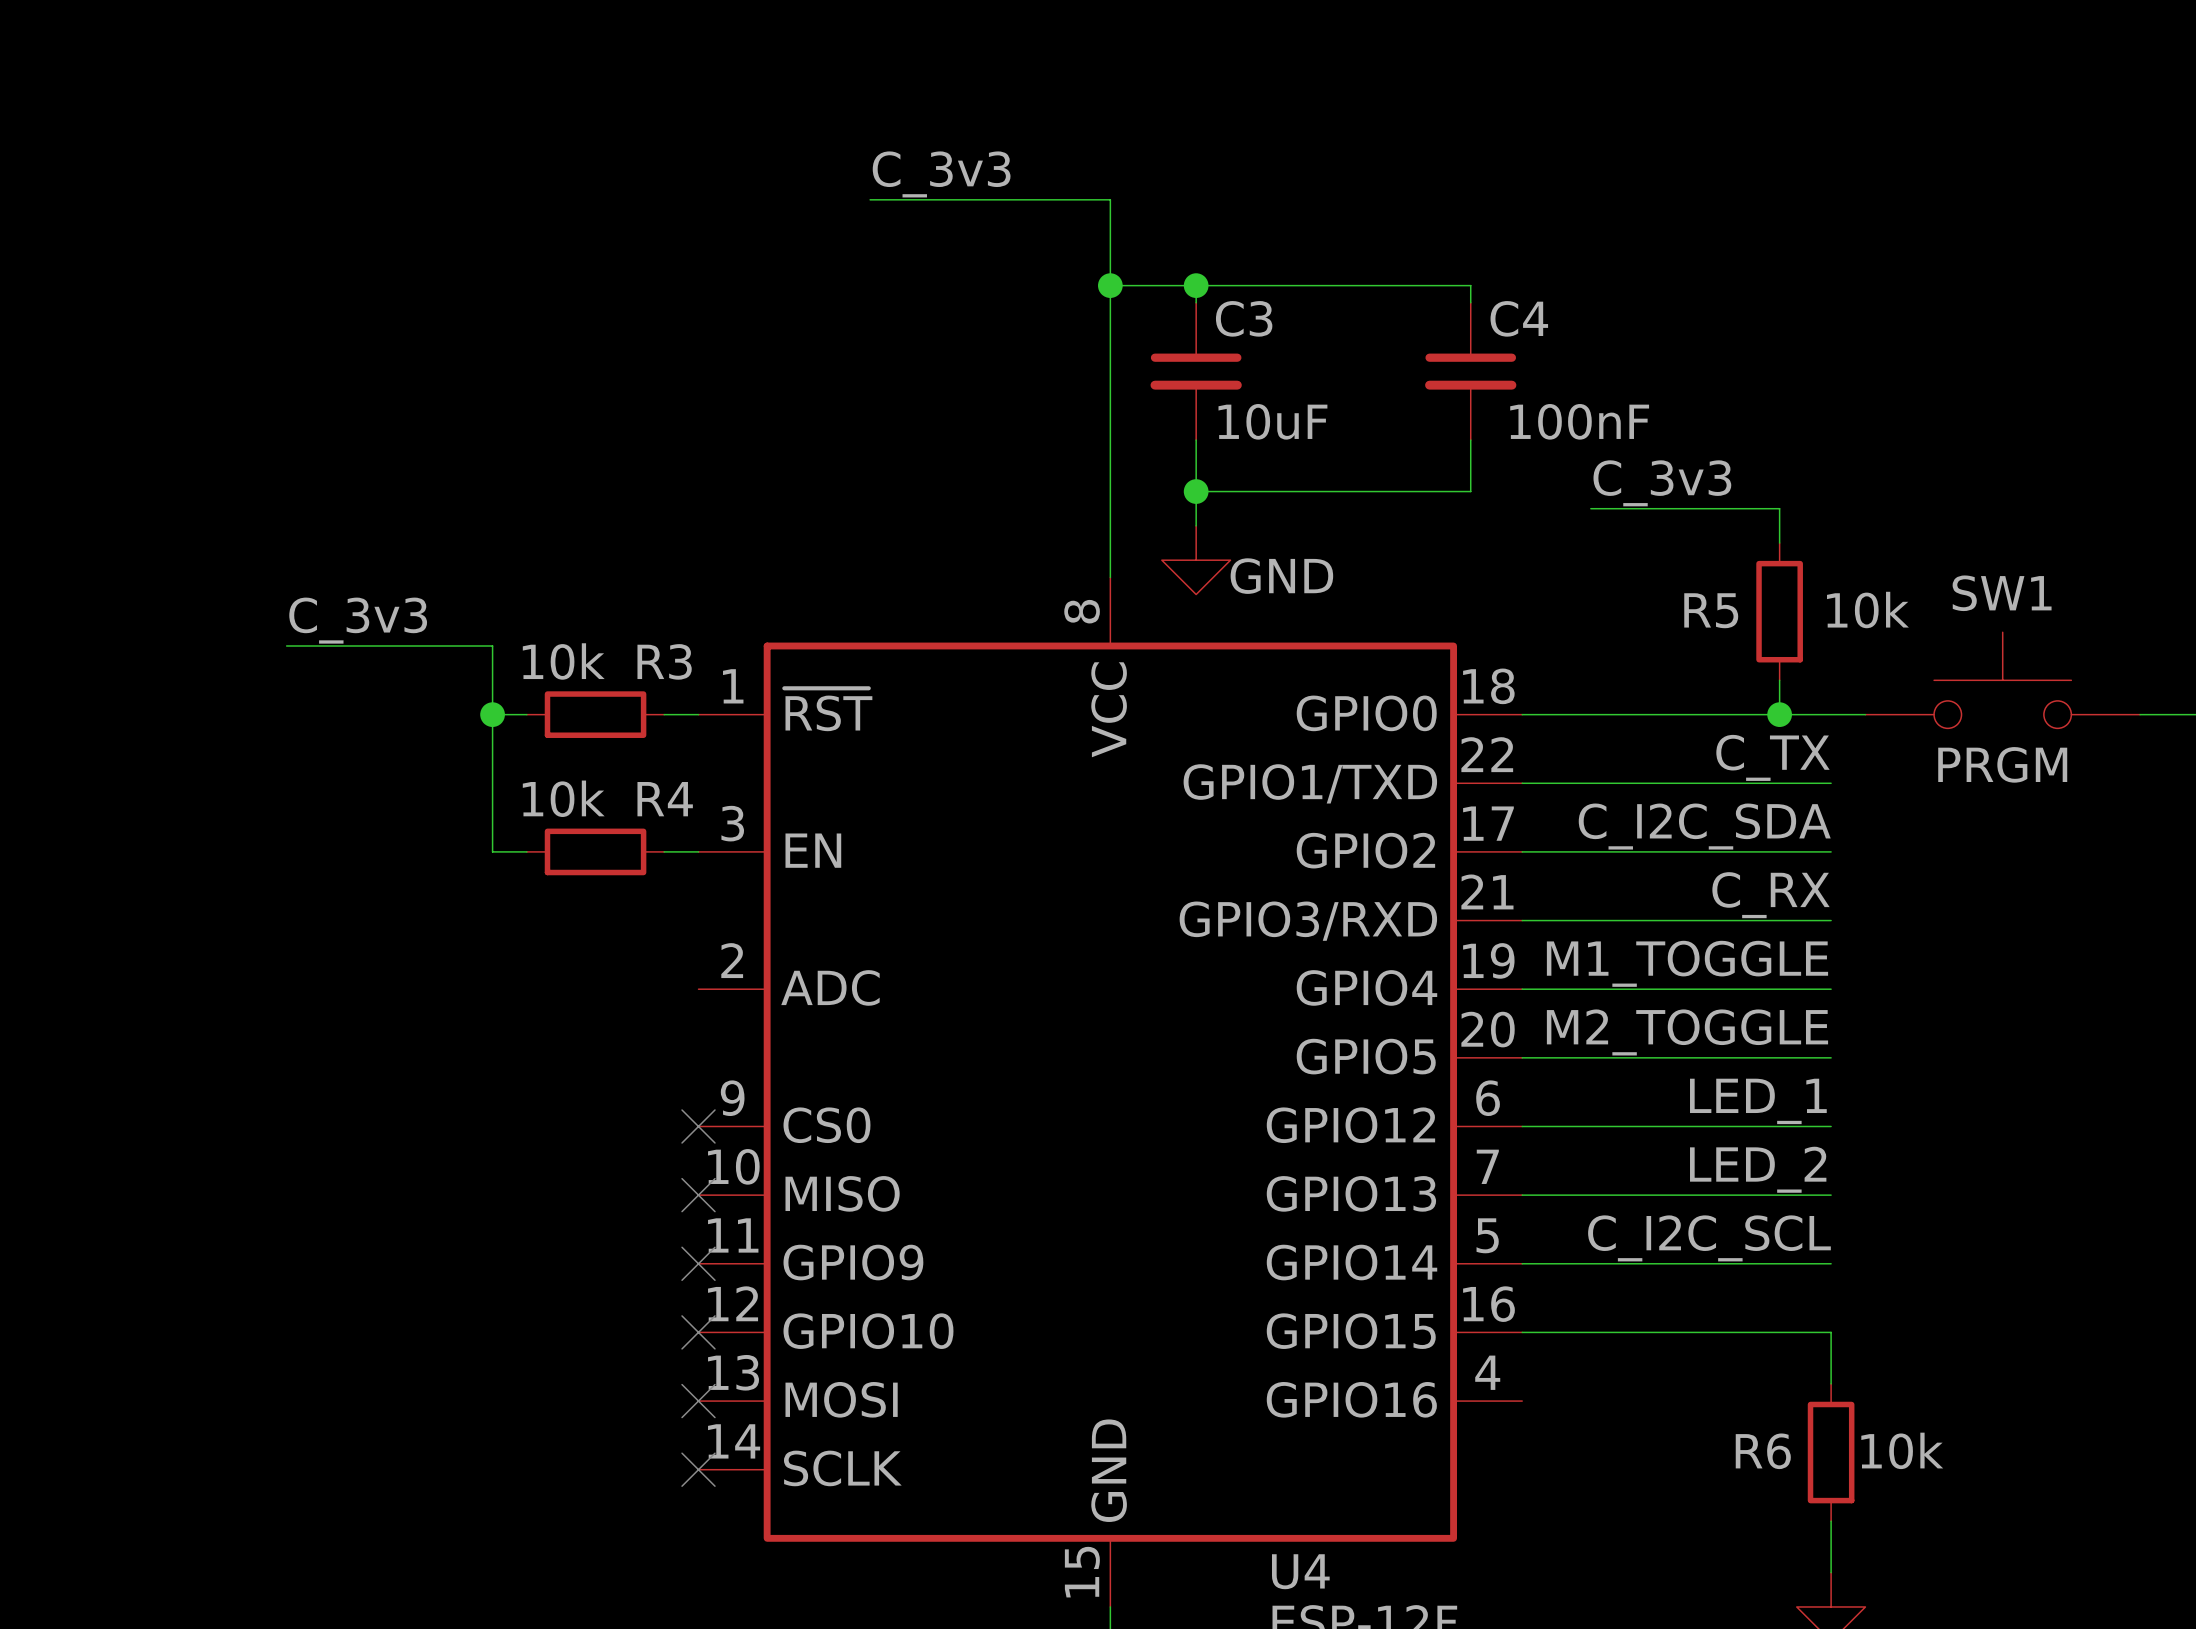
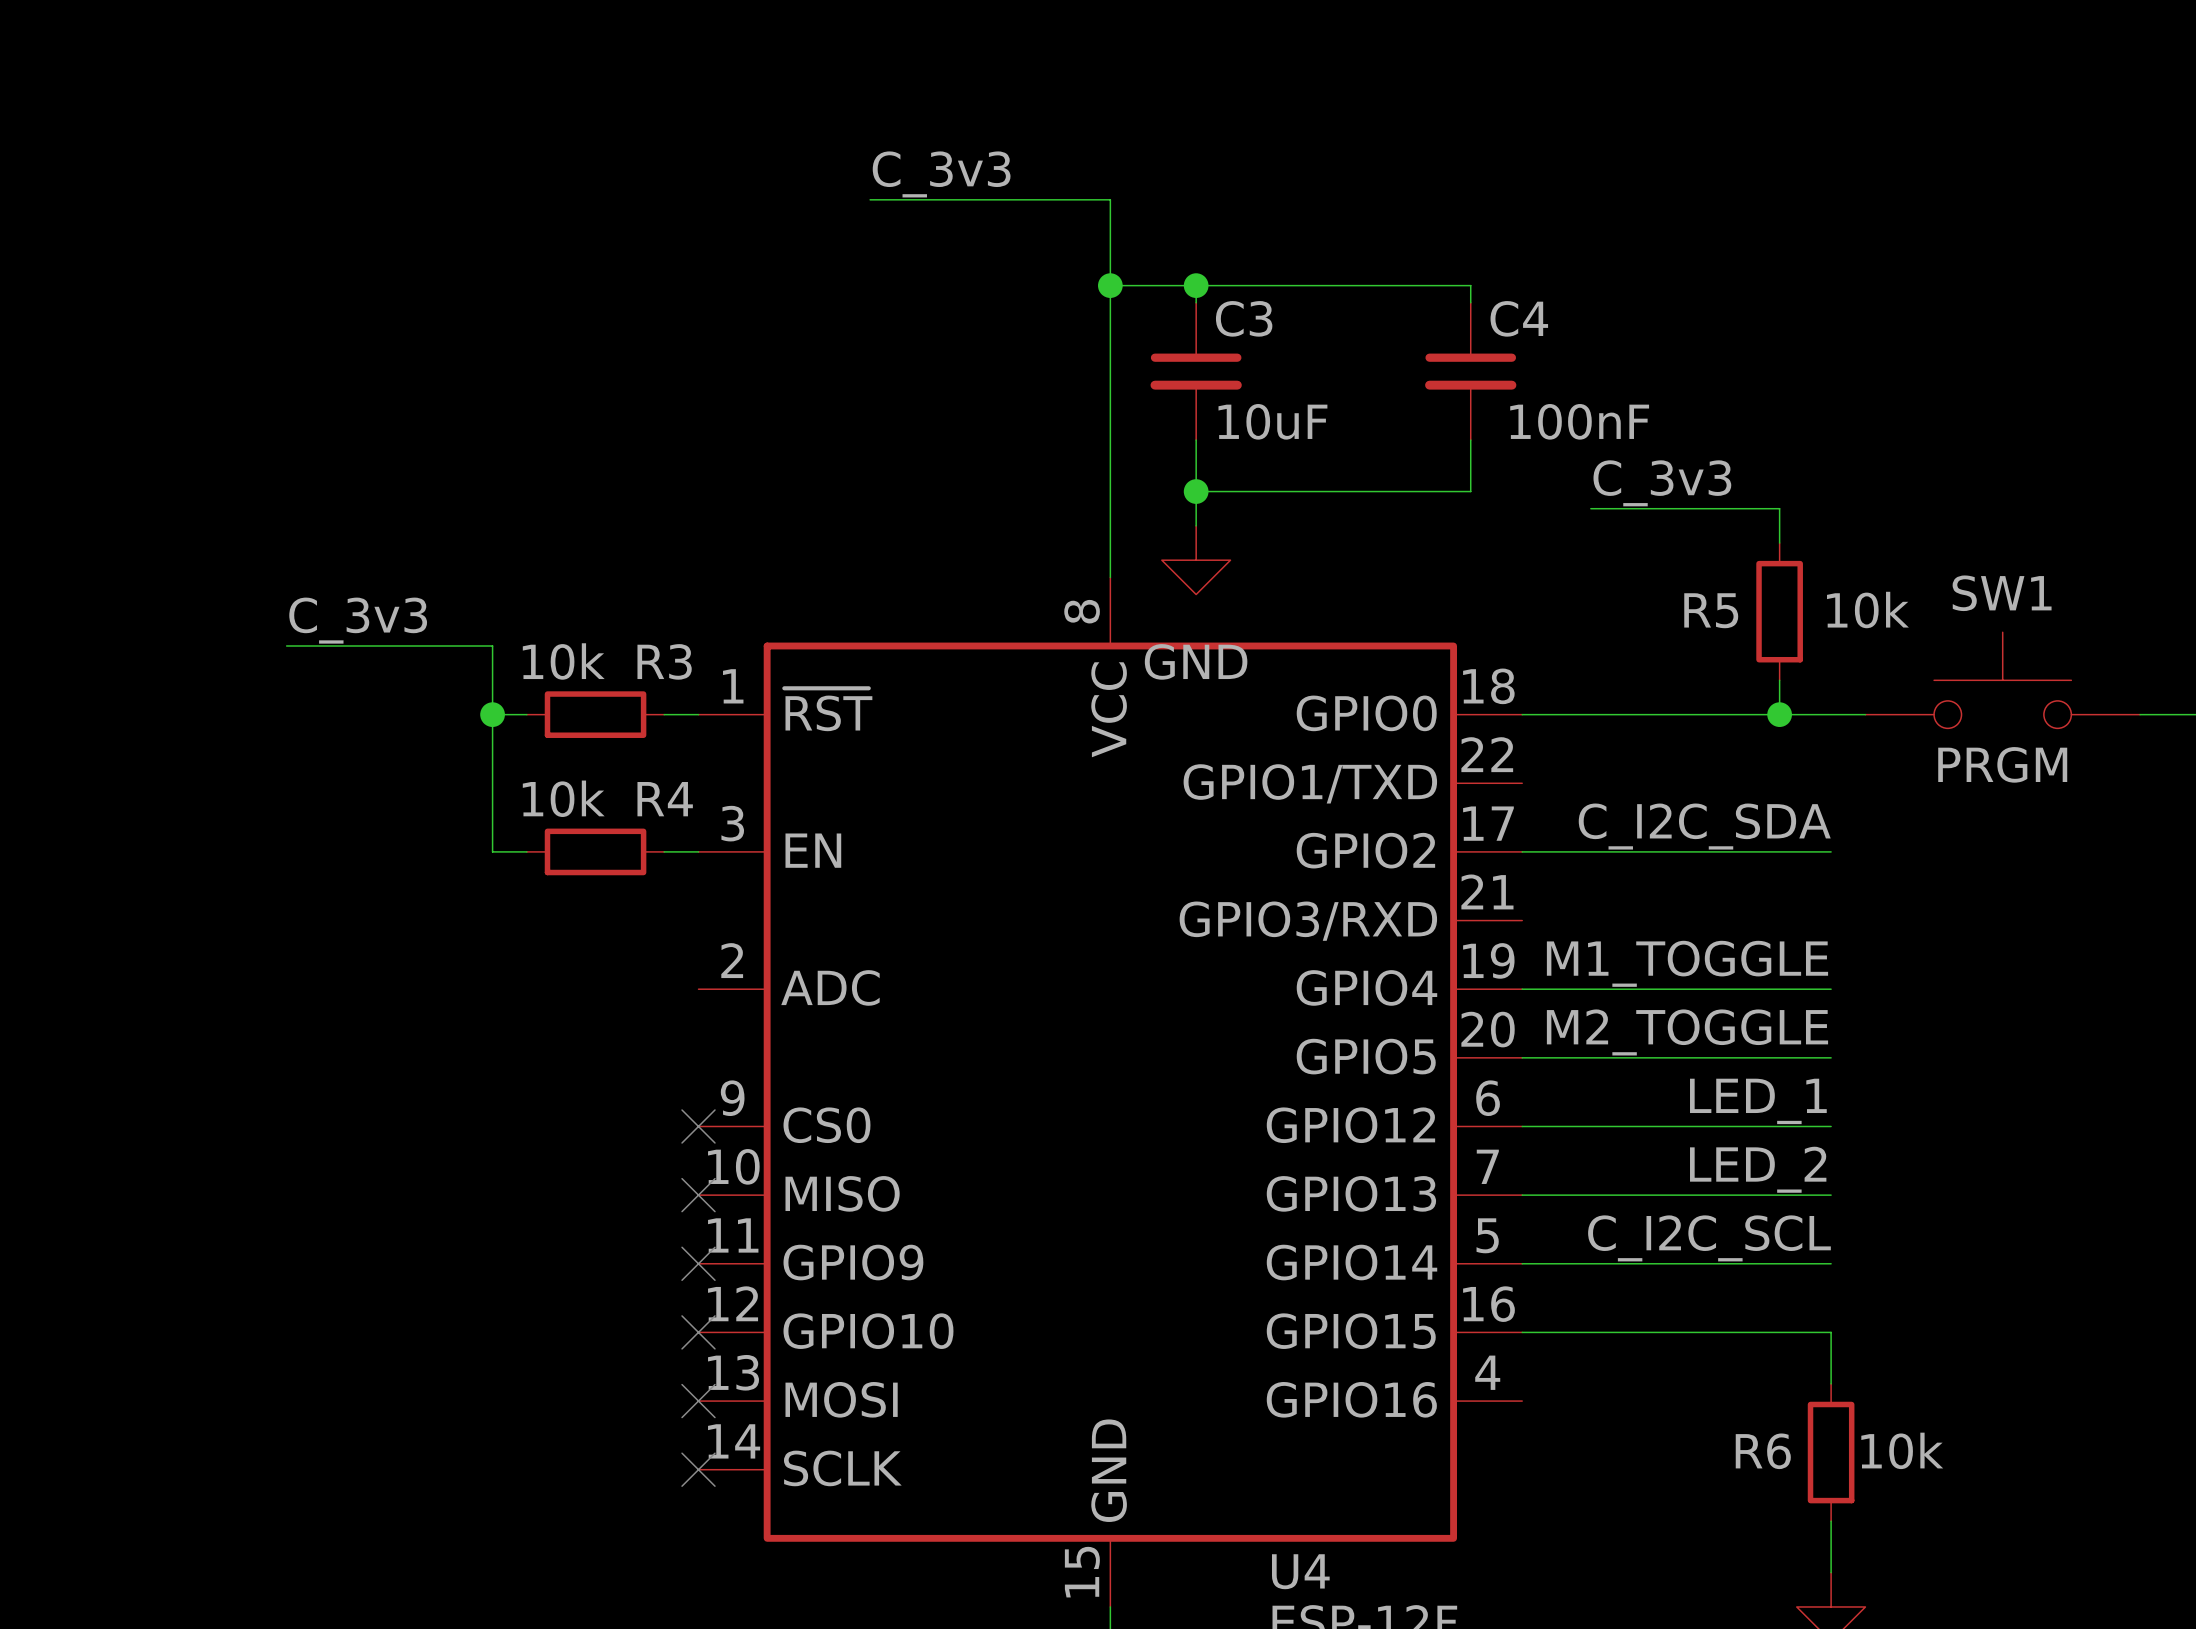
power symbol text position: GND (1281, 576) -> GND (1196, 661)
label: C_TX (1772, 757) -> none
wire: (1522, 783) (1831, 783) -> none
label: C_RX (1771, 895) -> none
wire: (1522, 920) (1831, 920) -> none

